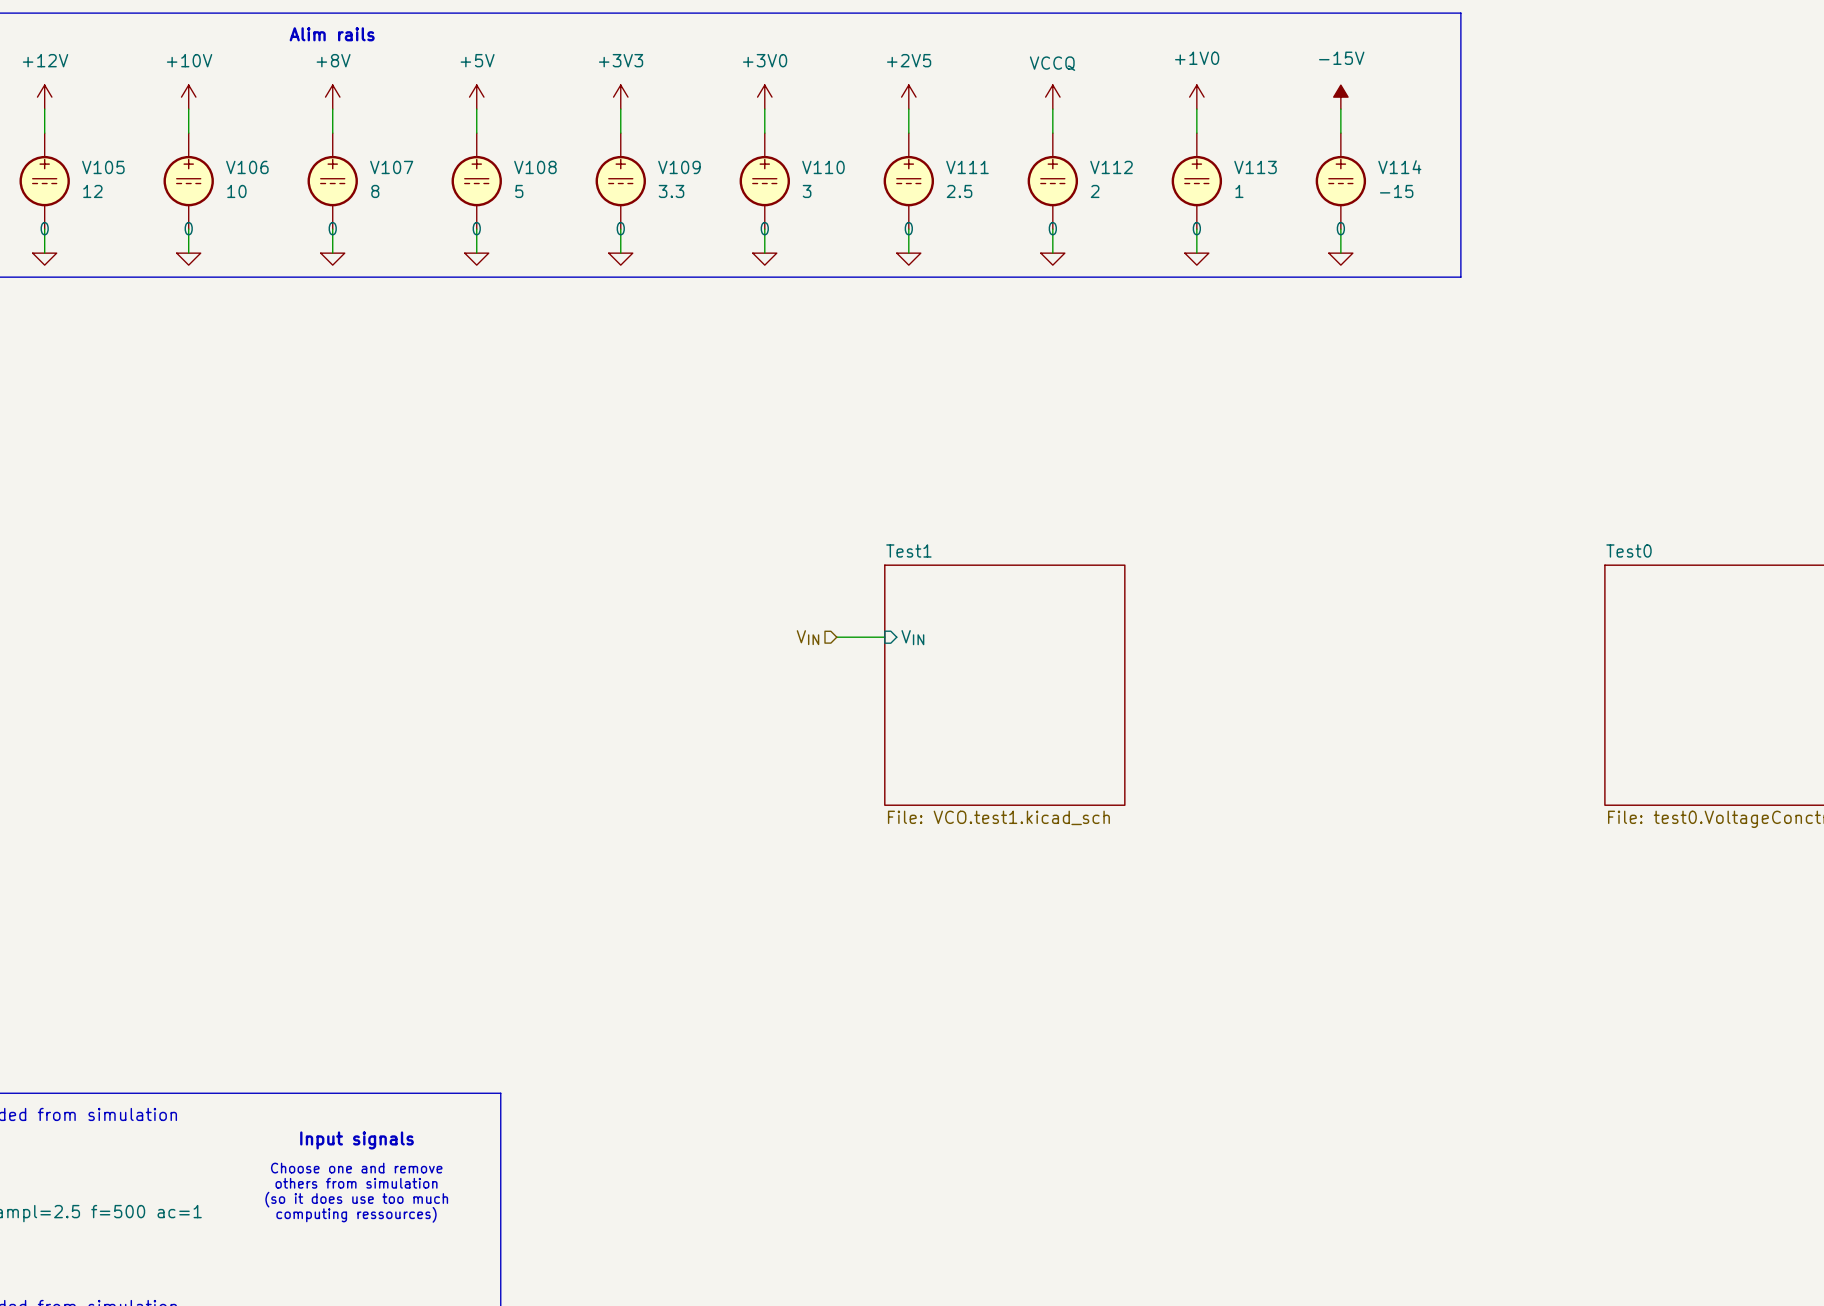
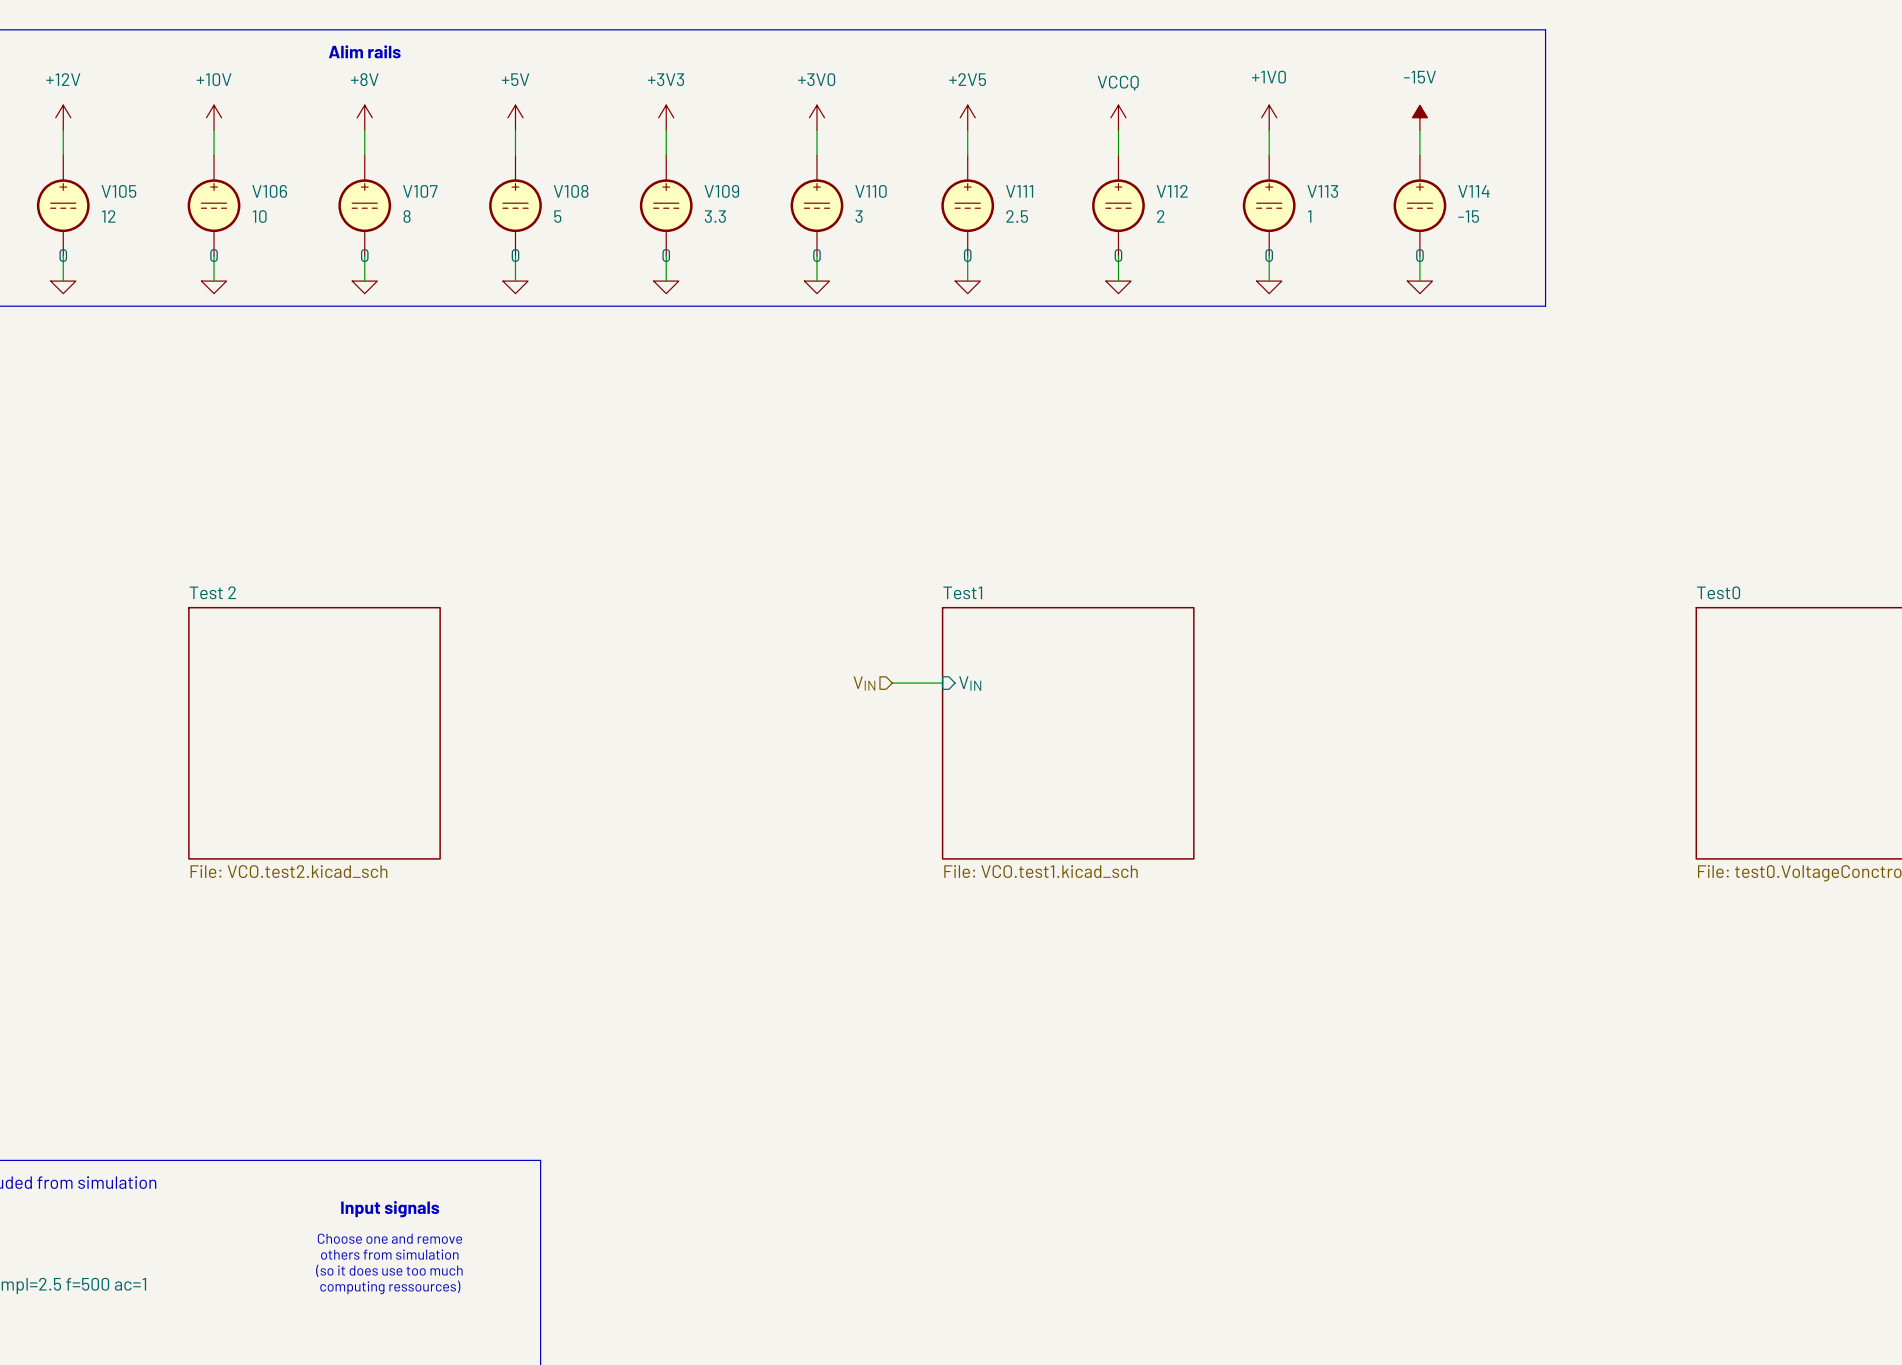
sheet Test 2: none -> File: VCO.test2.kicad_sch (314, 733)

